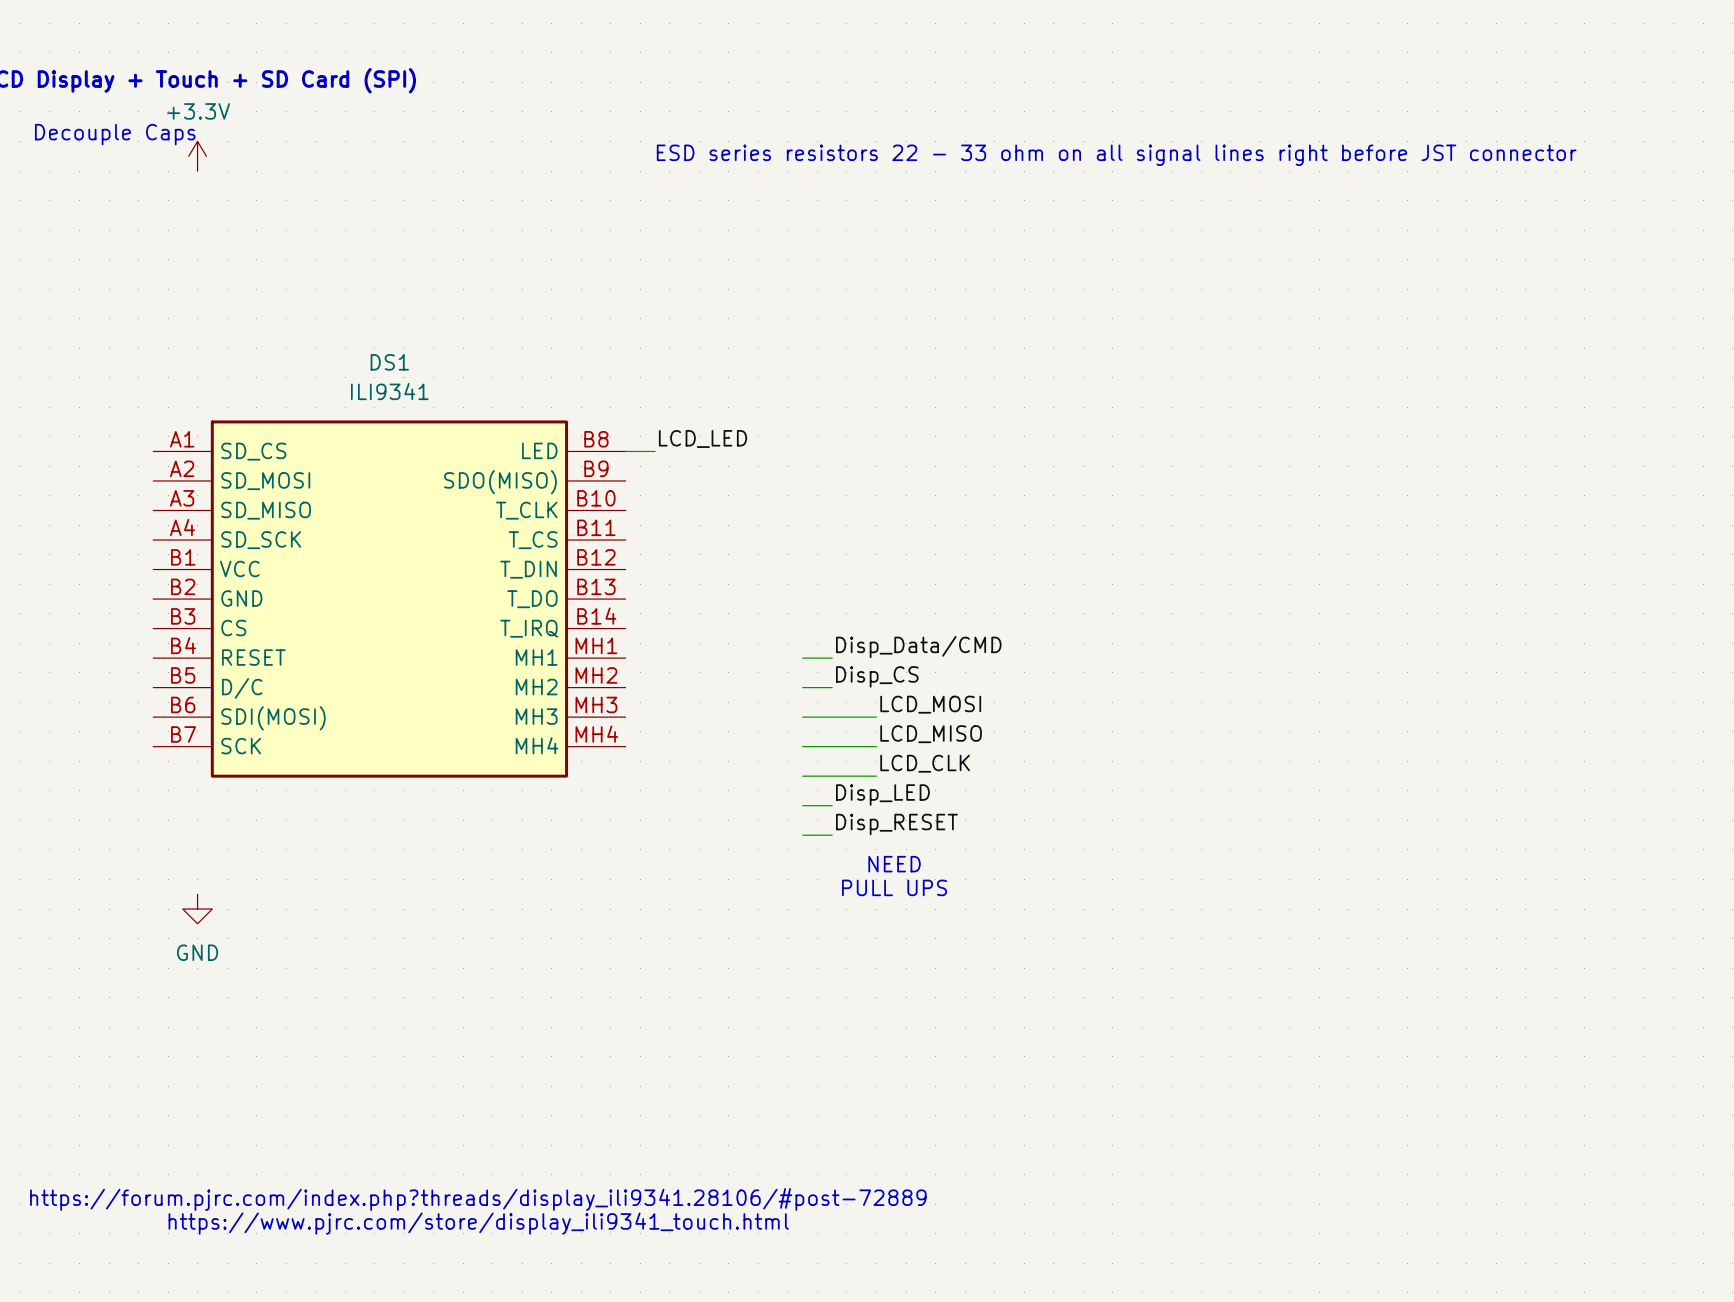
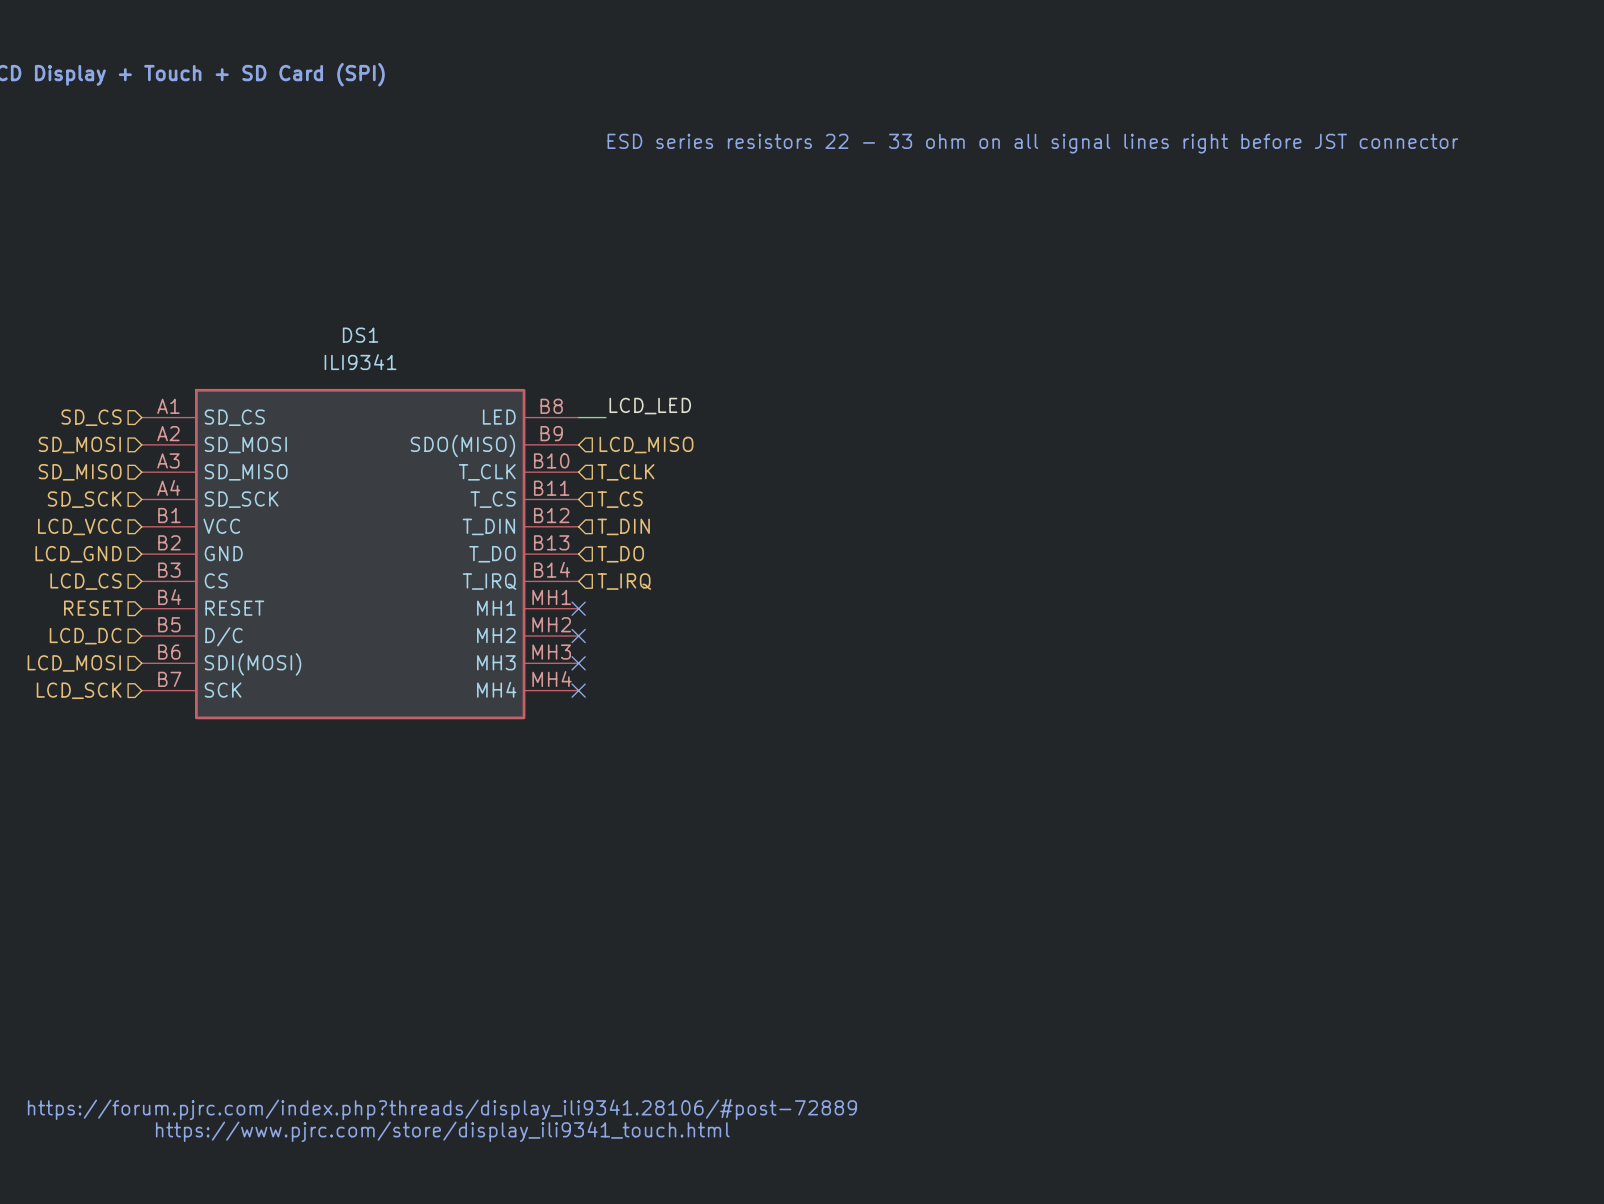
text: Decouple Caps (115, 134) -> none
power symbol: +3.3V (197, 156) -> none
hierarchical label: none -> SD_CS (91, 417)
hierarchical label: none -> SD_MOSI (79, 445)
hierarchical label: none -> LCD_MISO (646, 445)
hierarchical label: none -> SD_MISO (80, 472)
hierarchical label: none -> T_CLK (625, 472)
hierarchical label: none -> SD_SCK (84, 499)
hierarchical label: none -> T_CS (620, 499)
hierarchical label: none -> LCD_VCC (79, 526)
hierarchical label: none -> T_DIN (623, 526)
hierarchical label: none -> LCD_GND (78, 554)
hierarchical label: none -> T_DO (620, 554)
hierarchical label: none -> LCD_CS (85, 581)
hierarchical label: none -> T_IRQ (624, 581)
label: Disp_Data/CMD (918, 647) -> none
hierarchical label: none -> RESET (93, 608)
no-connect mark: none -> (578, 608)
wire: (802, 658) (832, 658) -> none
label: Disp_CS (877, 676) -> none
hierarchical label: none -> LCD_DC (85, 636)
no-connect mark: none -> (578, 636)
wire: (802, 687) (832, 687) -> none
label: LCD_MOSI (930, 704) -> none
hierarchical label: none -> LCD_MOSI (74, 663)
no-connect mark: none -> (578, 663)
wire: (802, 717) (876, 717) -> none
label: LCD_MISO (931, 734) -> none
hierarchical label: none -> LCD_SCK (79, 690)
no-connect mark: none -> (578, 690)
wire: (802, 746) (876, 746) -> none
label: LCD_CLK (925, 763) -> none
wire: (802, 776) (876, 776) -> none
label: Disp_LED (882, 794) -> none
wire: (802, 805) (832, 805) -> none
label: Disp_RESET (896, 824) -> none
wire: (802, 835) (832, 835) -> none
text: NEED (894, 864) -> none
text: PULL UPS (894, 887) -> none
power symbol: GND (197, 909) -> none

